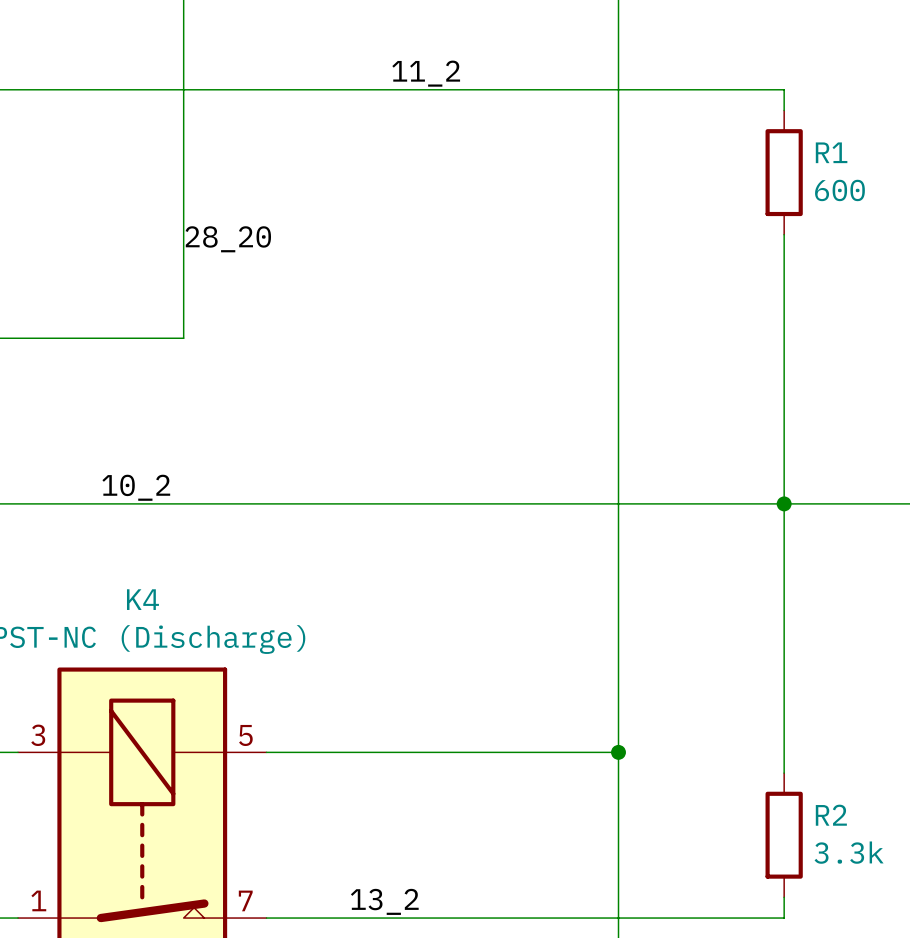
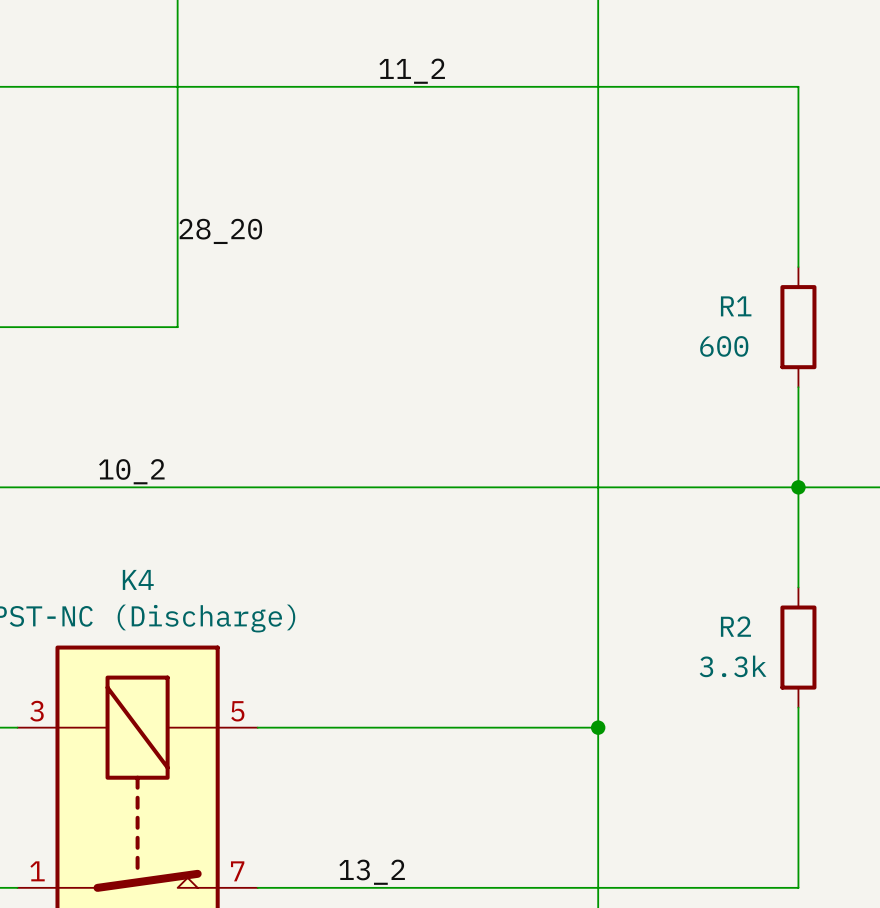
wire: (784, 89) (784, 110) -> (758, 86) (798, 86) (798, 267)
R1 name position: R1 (831, 152) -> R1 (736, 306)
R1 position: (784, 172) -> (798, 327)
R1 value position: 600 (839, 190) -> 600 (724, 346)
wire: (784, 234) (784, 773) -> none
wire: none -> (798, 387) (798, 587)
junction position: (784, 503) -> (798, 487)
R2 name position: R2 (831, 815) -> R2 (735, 626)
R2 position: (784, 835) -> (798, 647)
R2 value position: 3.3k (849, 852) -> 3.3k (733, 666)
wire: (784, 897) (784, 918) -> (798, 707) (798, 887) (758, 887)

